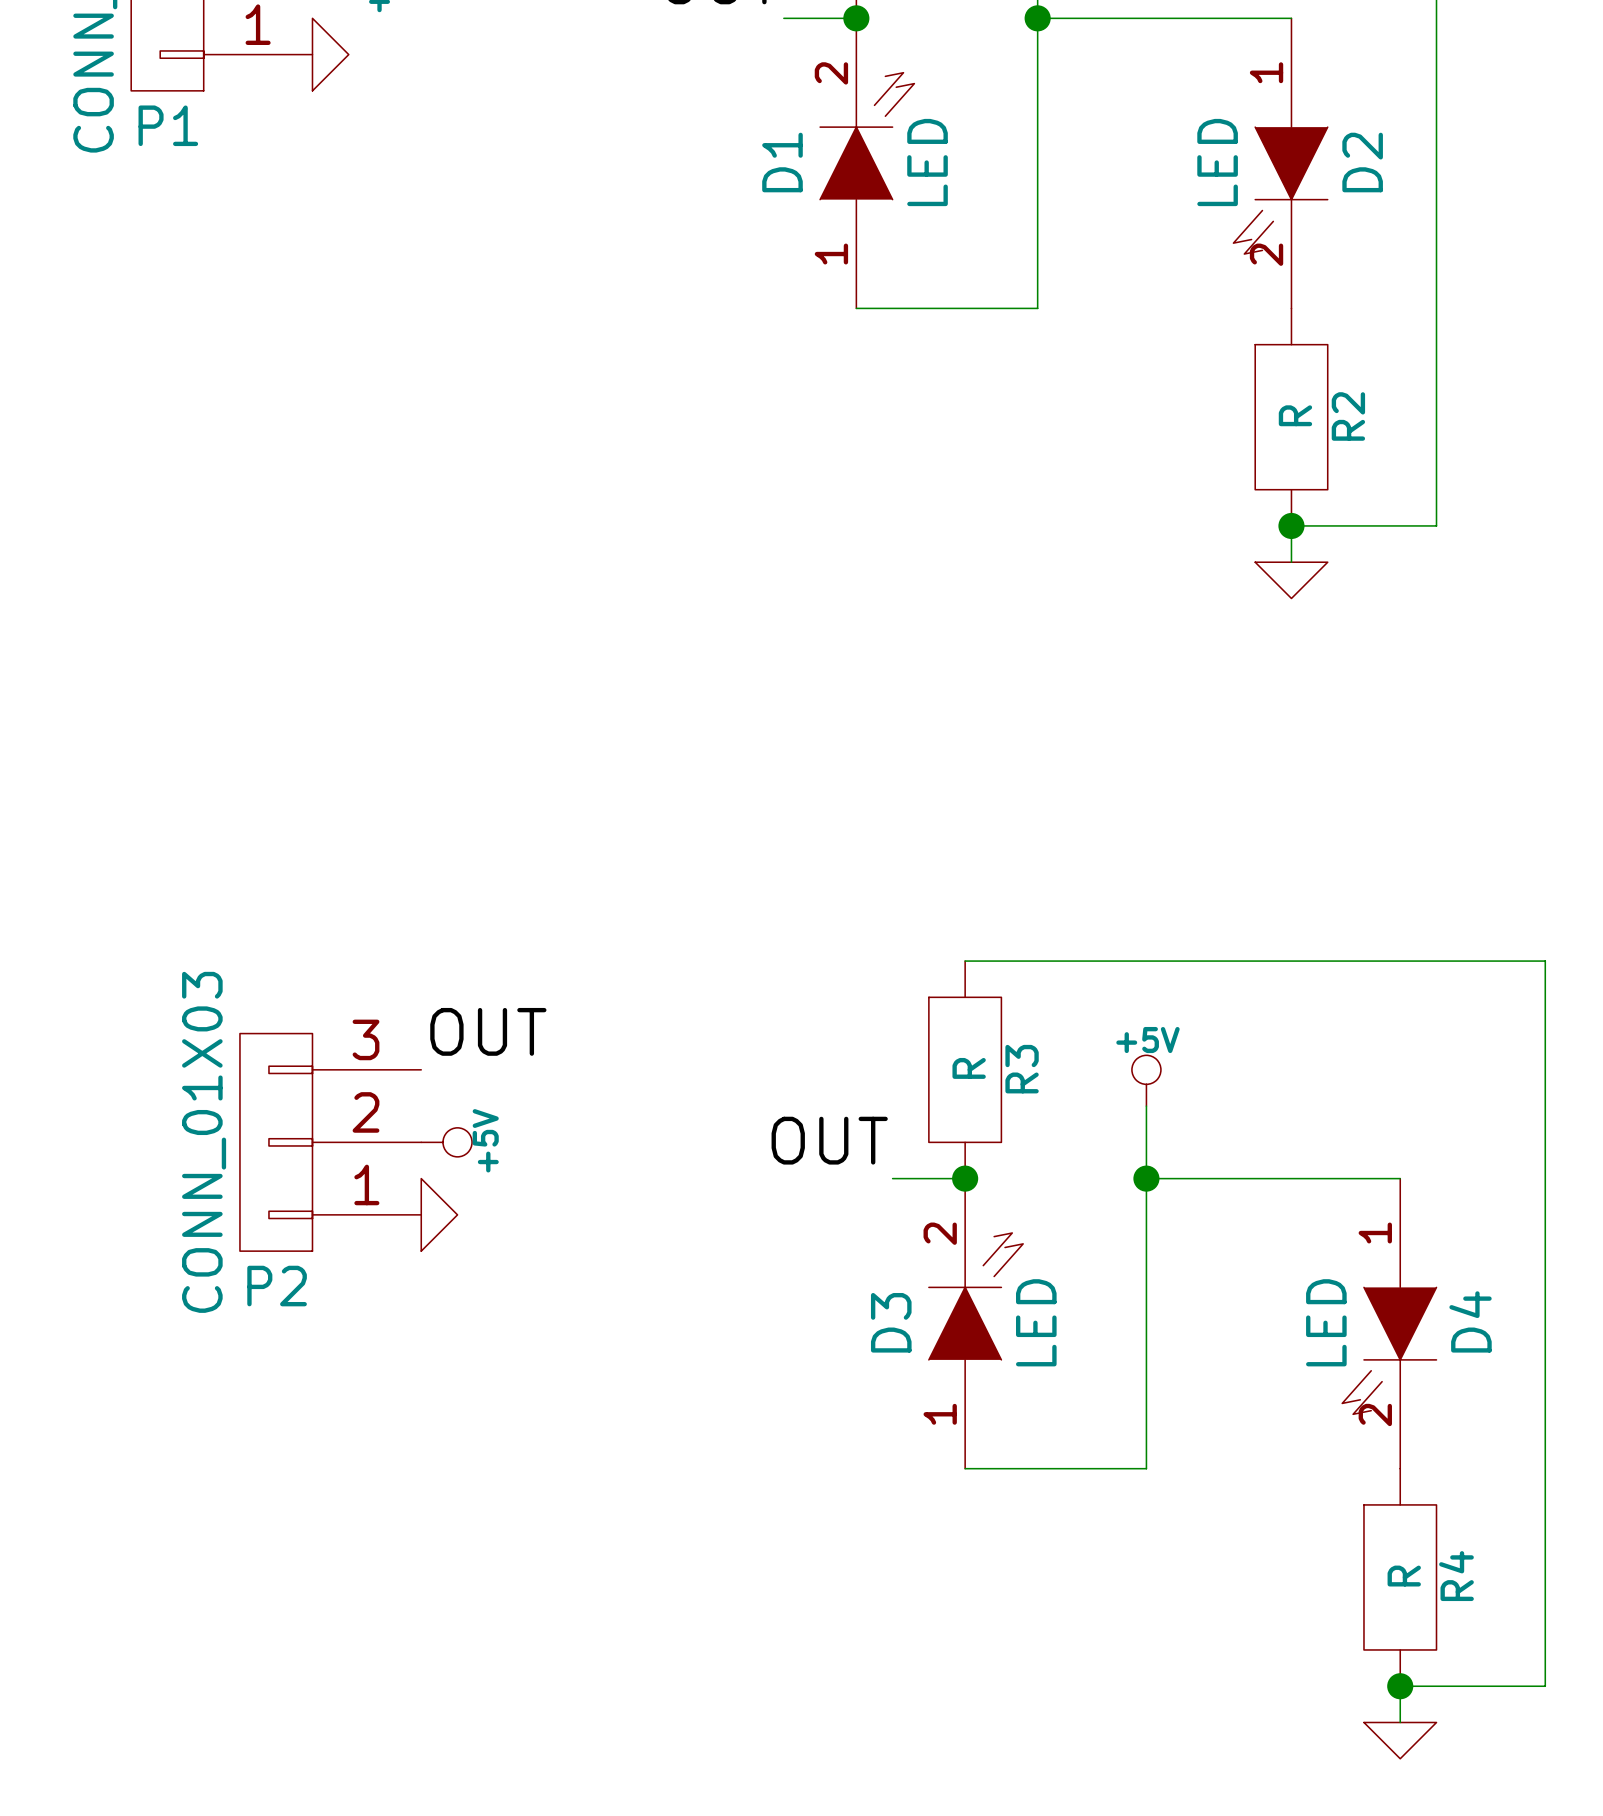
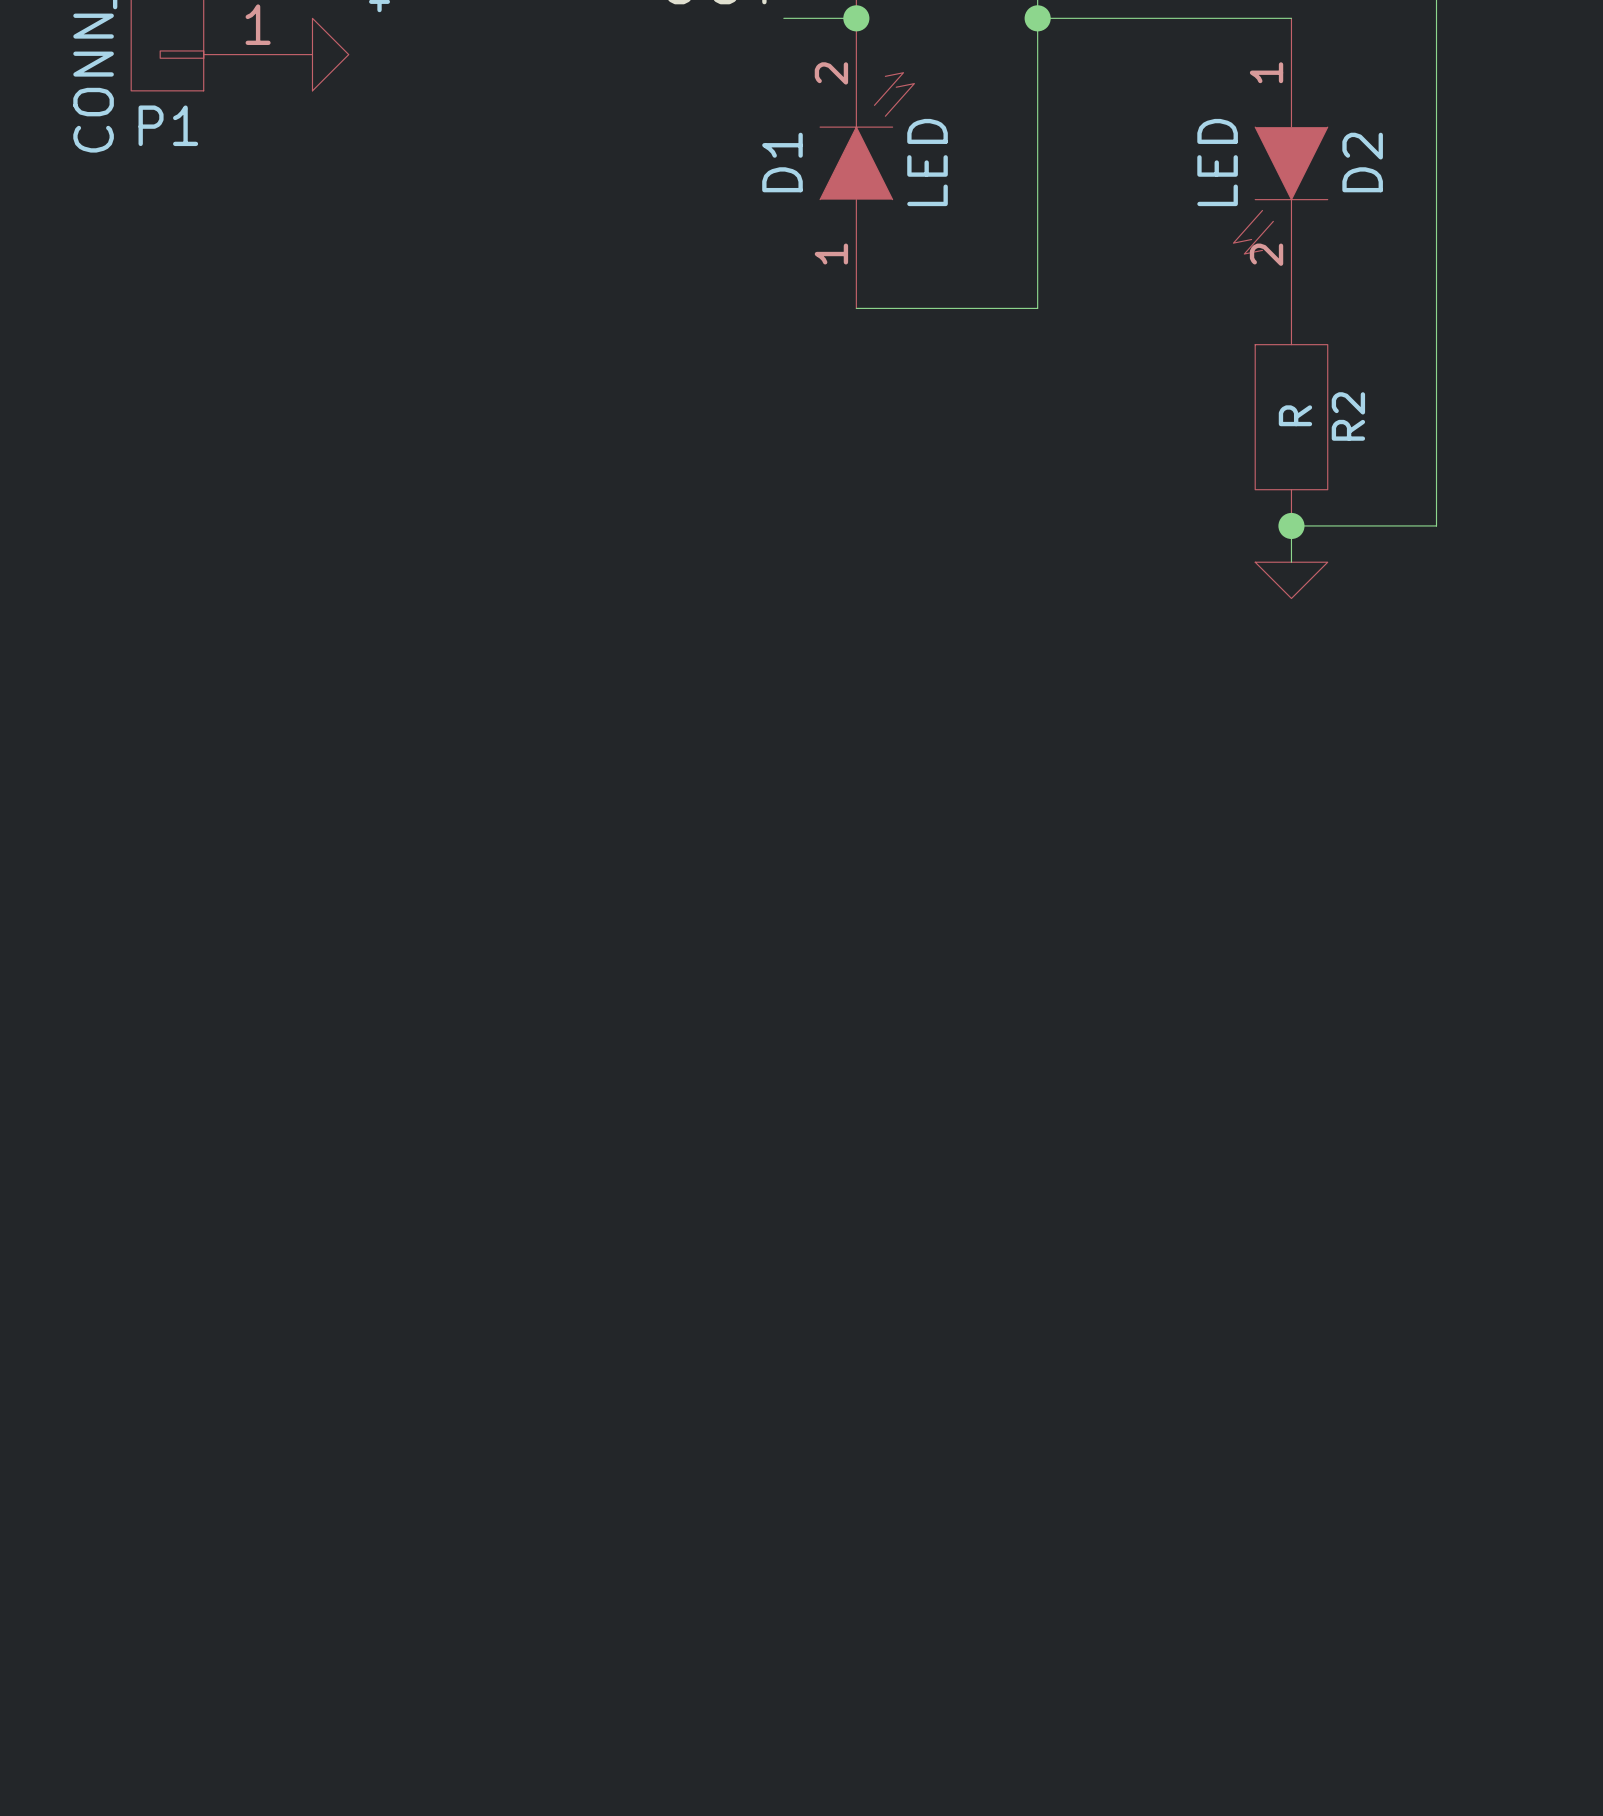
wire: (965, 961) (1545, 961) (1545, 1686) (1400, 1686) (1400, 1722) -> none
label: OUT (488, 1031) -> none
R3: R (965, 1069) -> none
power symbol: +5V (1146, 1080) -> none
wire: (1146, 1106) (1146, 1468) (965, 1468) -> none
label: OUT (829, 1140) -> none
P2: CONN_01X03 (330, 1142) -> none
power symbol: +5V (446, 1142) -> none
wire: (892, 1178) (965, 1178) -> none
junction: (965, 1178) -> none
wire: (1146, 1178) (1400, 1178) -> none
junction: (1146, 1178) -> none
power symbol: (439, 1214) -> none
D3: LED (976, 1323) -> none
D4: LED (1389, 1323) -> none
R4: R (1400, 1577) -> none
junction: (1400, 1686) -> none
power symbol: (1400, 1740) -> none

